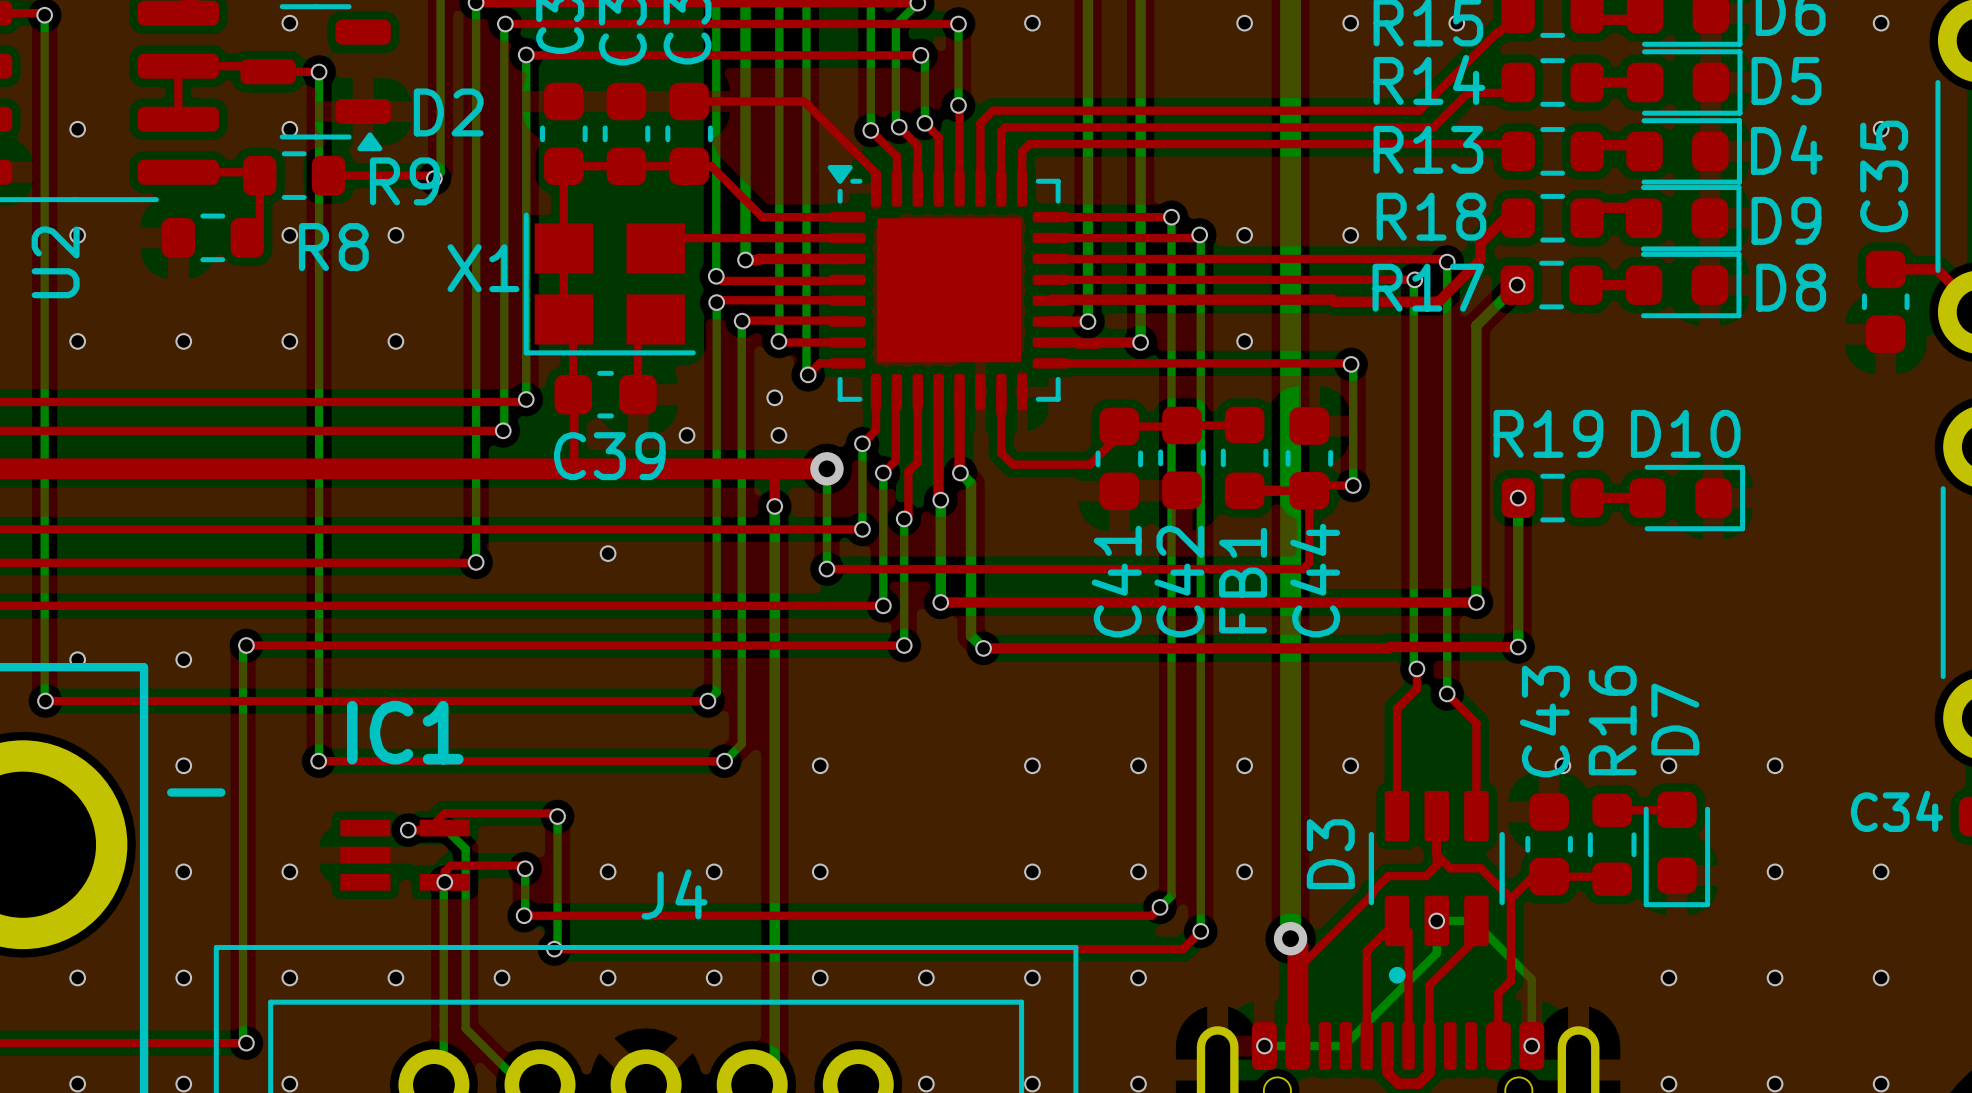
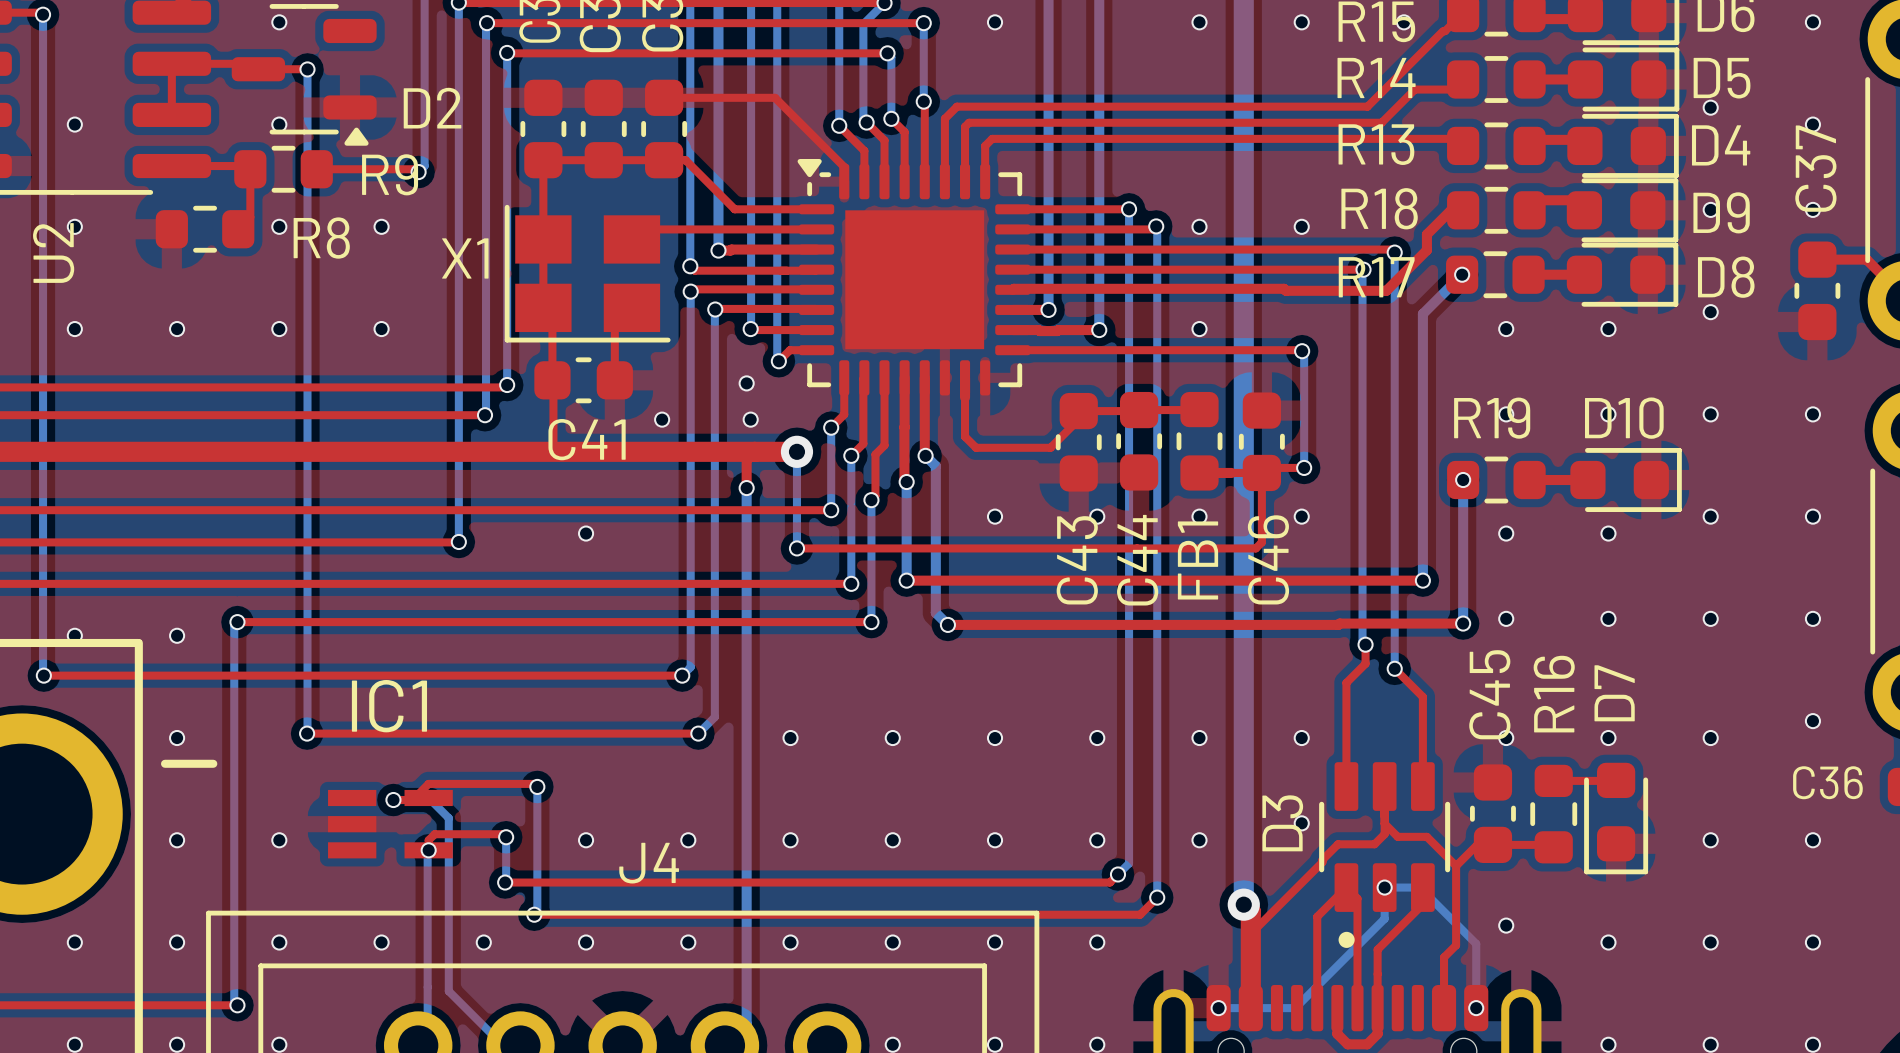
via: none -> (1710, 107)
C35 name: C35 (1884, 176) -> C37 (1815, 168)
via: none -> (1710, 209)
via: none -> (1812, 209)
via: none -> (1710, 312)
via: none -> (1506, 329)
via: none -> (1608, 329)
via: none -> (1506, 414)
via: none -> (1608, 414)
via: none -> (1710, 414)
via: none -> (1812, 414)
C39 name: C39 (609, 456) -> C41 (587, 439)
via: none -> (995, 516)
via: none -> (1097, 516)
via: none -> (1199, 516)
via: none -> (1301, 516)
via: none -> (1710, 516)
via: none -> (1812, 516)
via: none -> (1506, 533)
via: none -> (1608, 533)
C44 name: C44 (1315, 580) -> C46 (1268, 559)
C41 name: C41 (1116, 581) -> C43 (1077, 560)
C42 name: C42 (1179, 581) -> C44 (1137, 560)
via: none -> (1506, 618)
via: none -> (1608, 618)
via: none -> (1710, 618)
via: none -> (1812, 618)
C43 name: C43 (1544, 721) -> C45 (1489, 694)
via: none -> (1812, 721)
via: none -> (892, 738)
C34 name: C34 (1896, 811) -> C36 (1827, 782)
via: none -> (1301, 823)
via: none -> (892, 840)
via: none -> (1506, 925)

